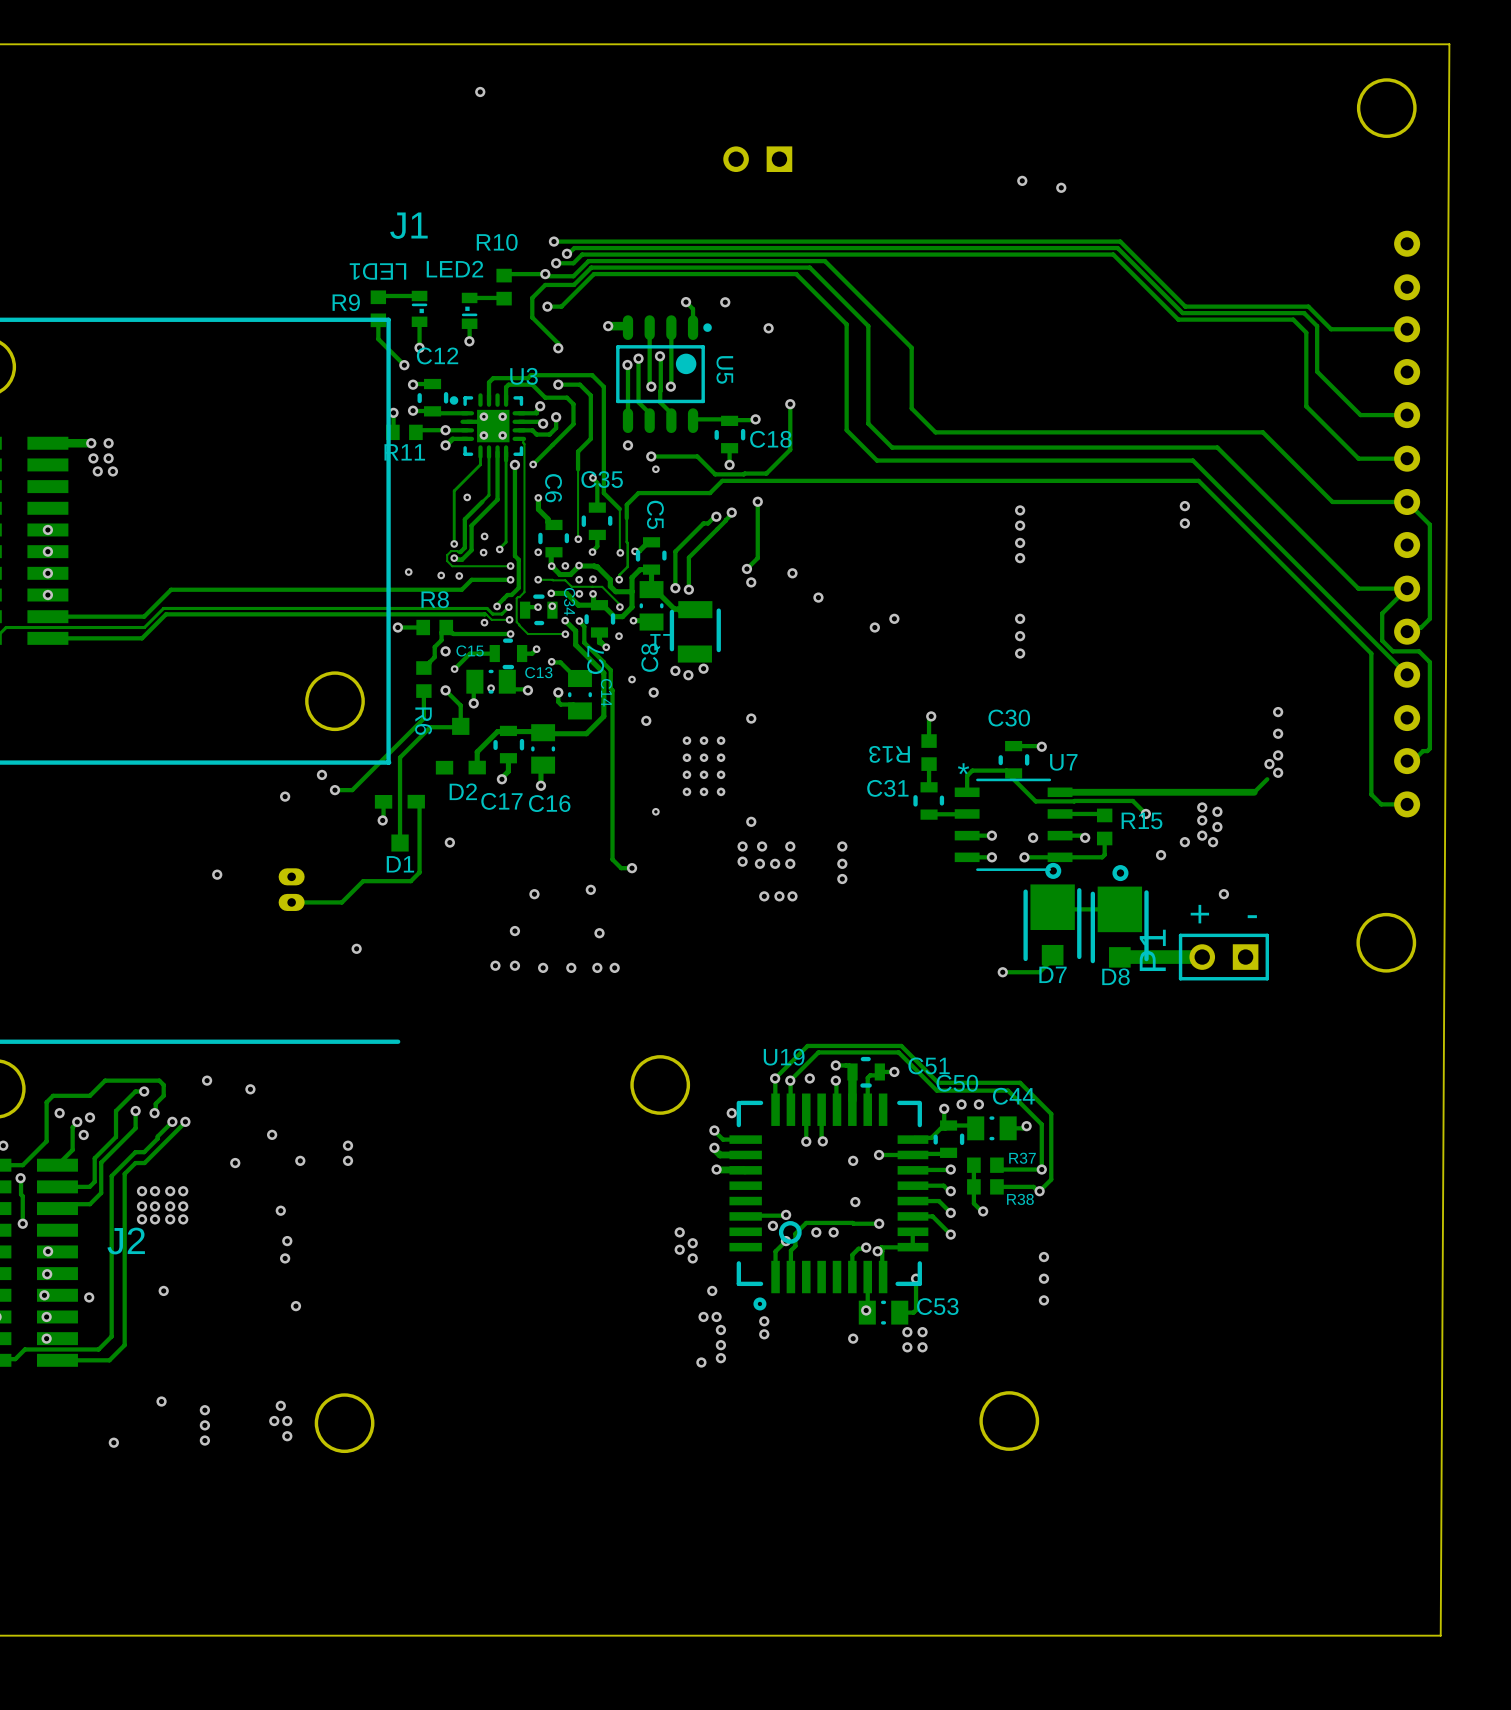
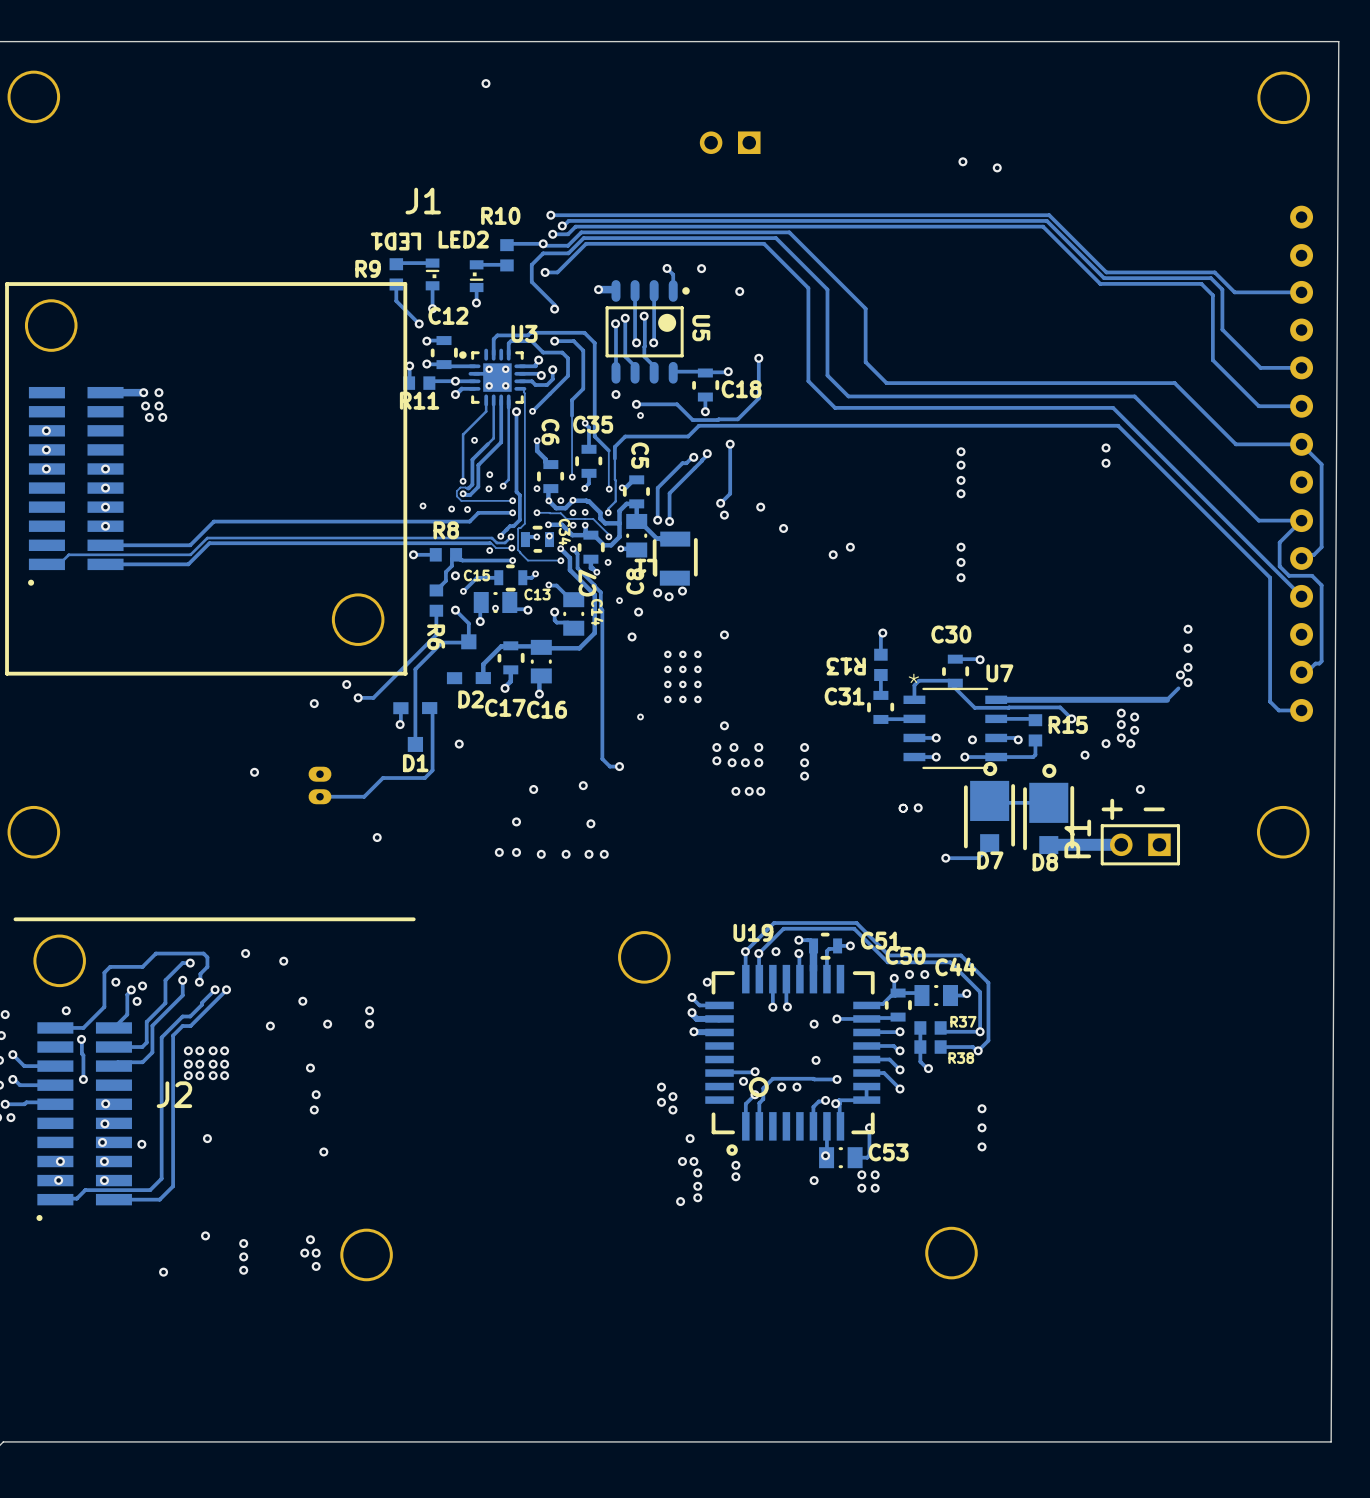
via: none -> (903, 808)
via: none -> (918, 807)

